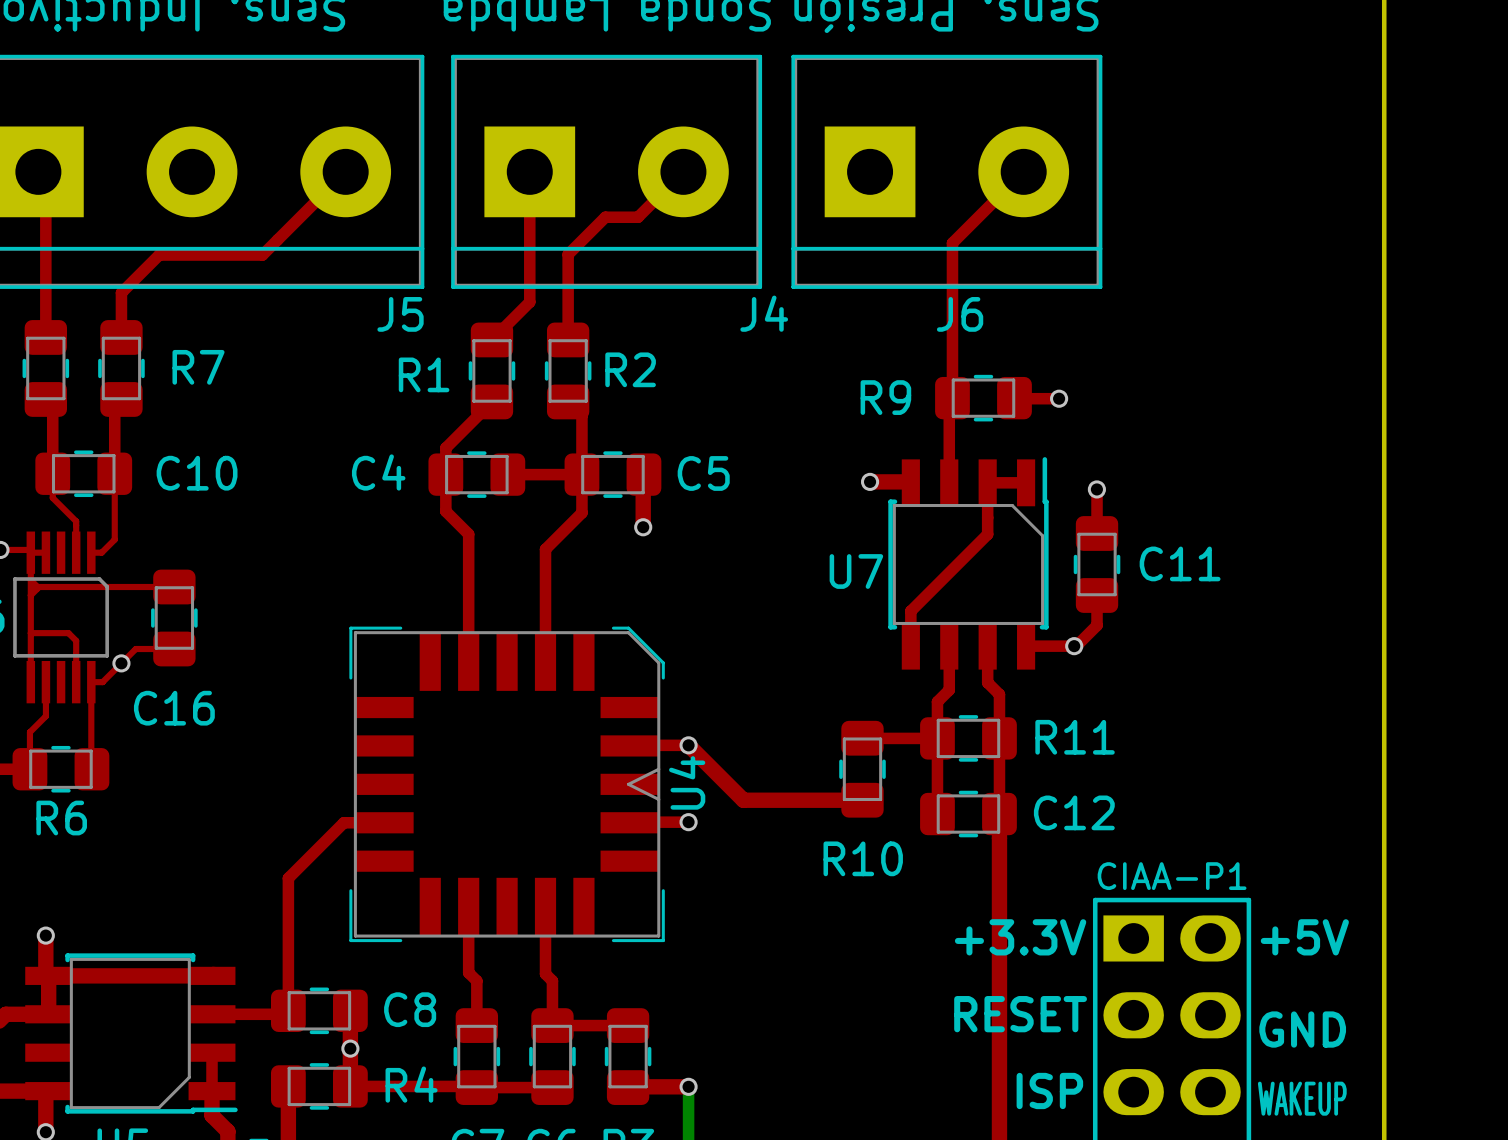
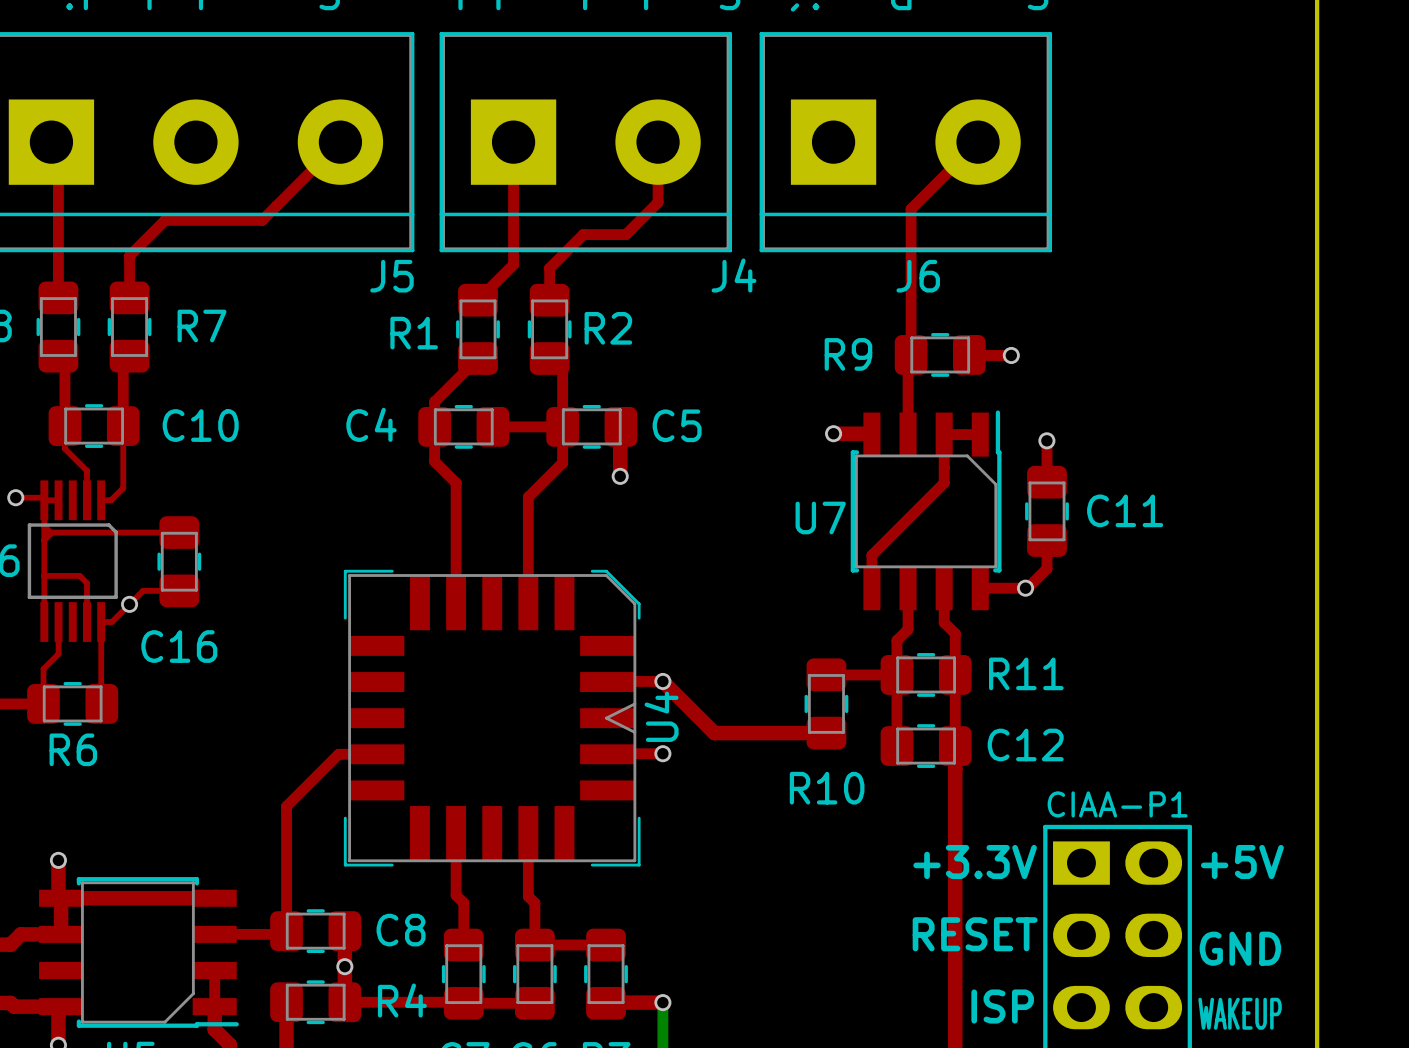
top track: (683, 171) (638, 217) (605, 217) (568, 254) (568, 305) -> (658, 142) (658, 202) (625, 234) (583, 234) (549, 268)

